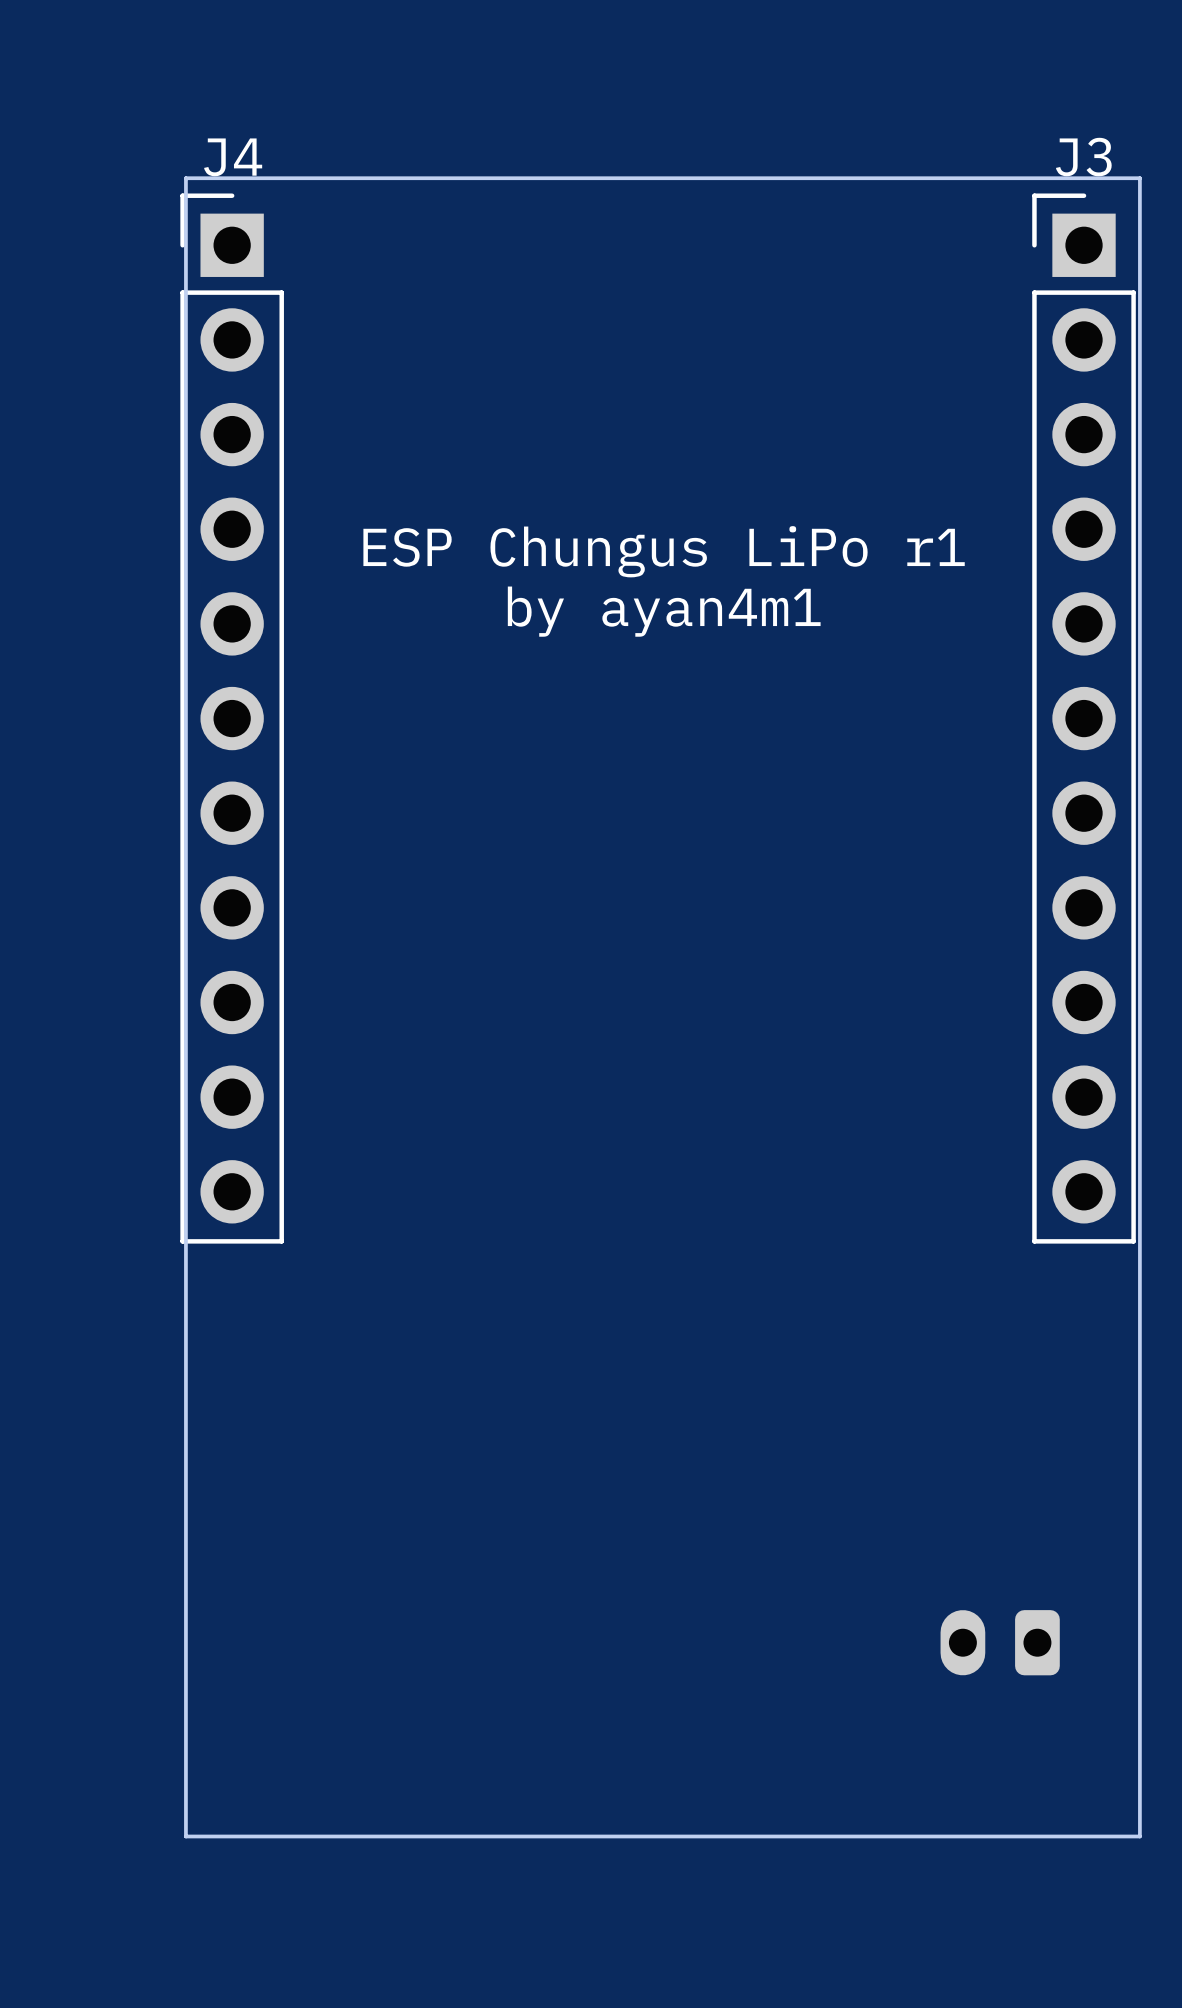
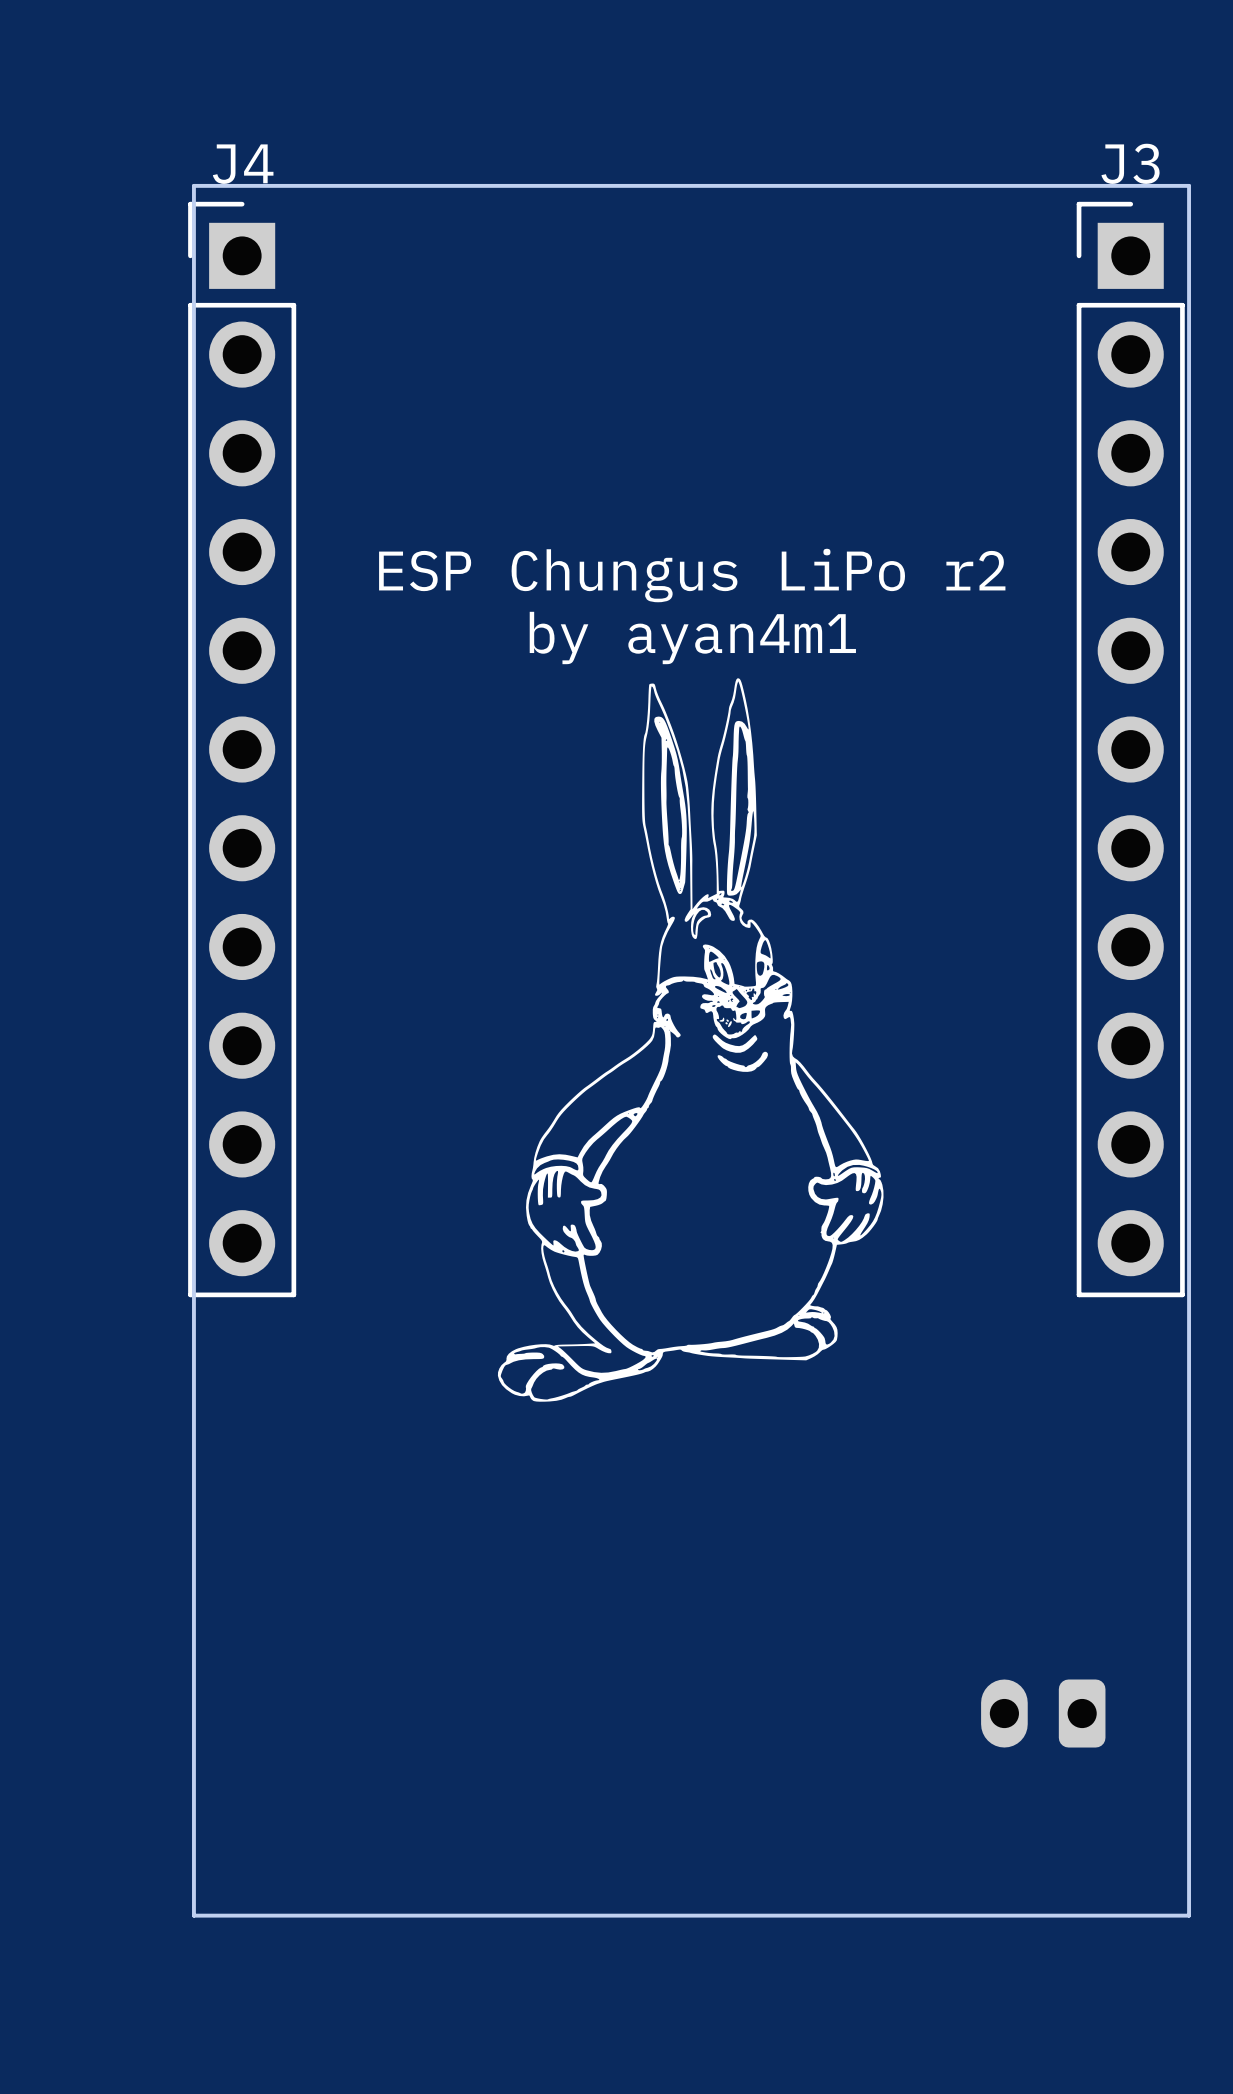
text: ESP Chungus LiPo r1 (664, 551) -> ESP Chungus LiPo r2 (692, 575)
drawing: none -> [497, 678, 884, 1402]

